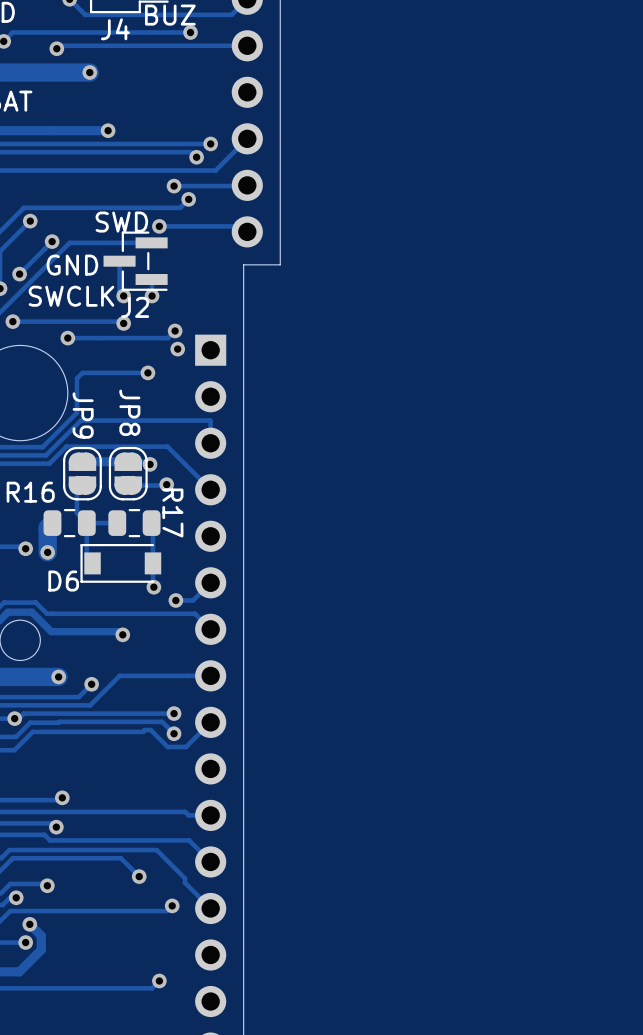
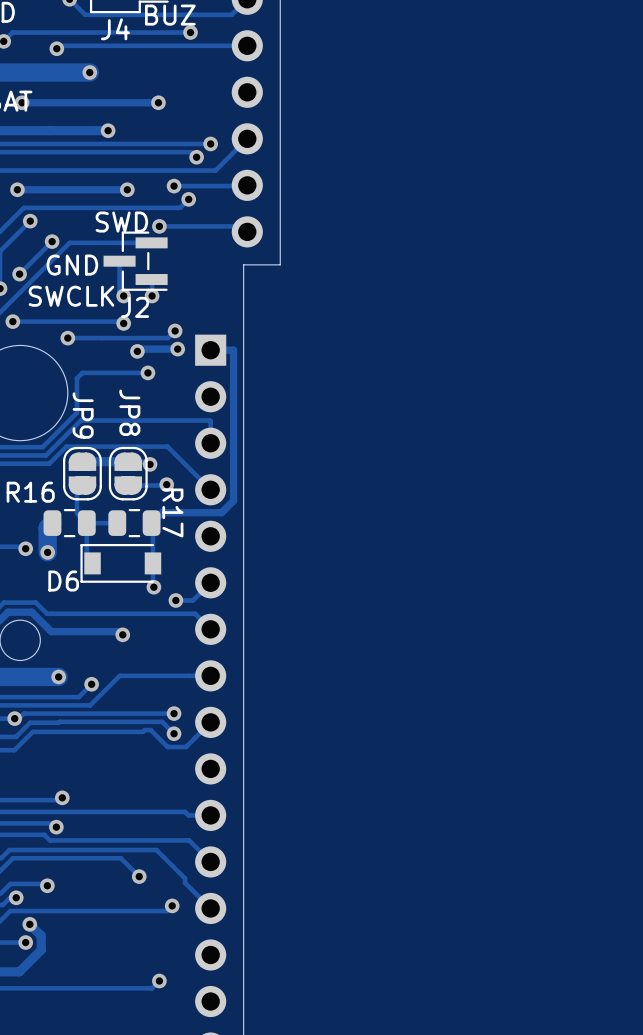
via: none -> (22, 102)
track: none -> (158, 102) (22, 102)
via: none -> (158, 102)
via: none -> (17, 189)
track: none -> (127, 189) (17, 189)
via: none -> (127, 189)
track: none -> (177, 349) (139, 349) (137, 351)
track: none -> (210, 350) (233, 350) (233, 500) (221, 512) (162, 512) (151, 523)
via: none -> (137, 351)

